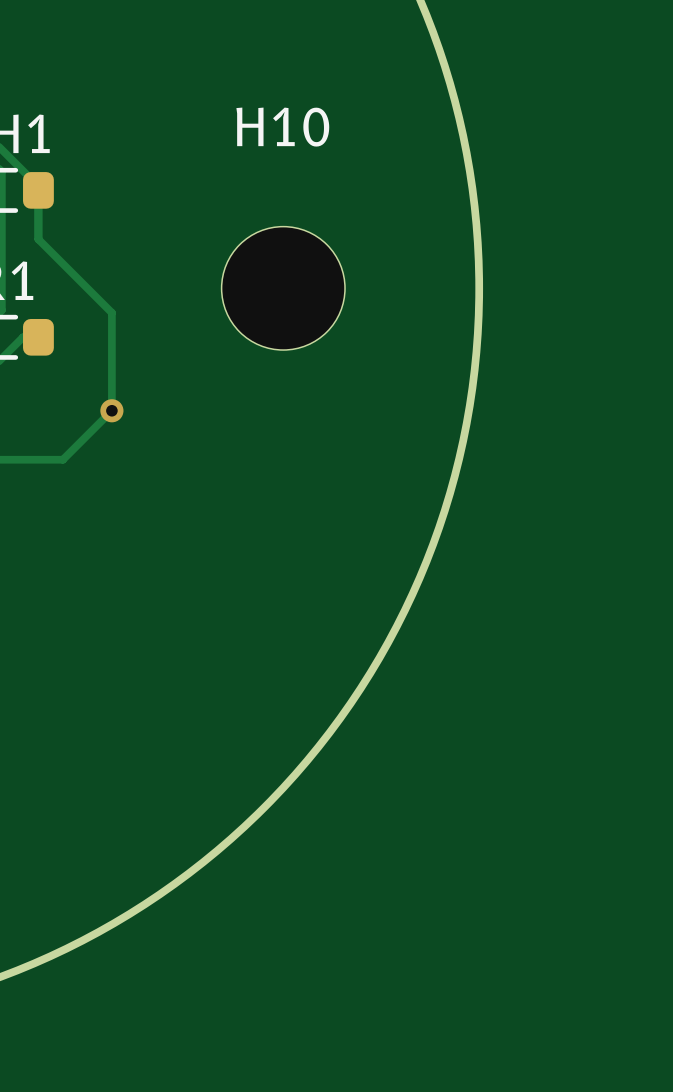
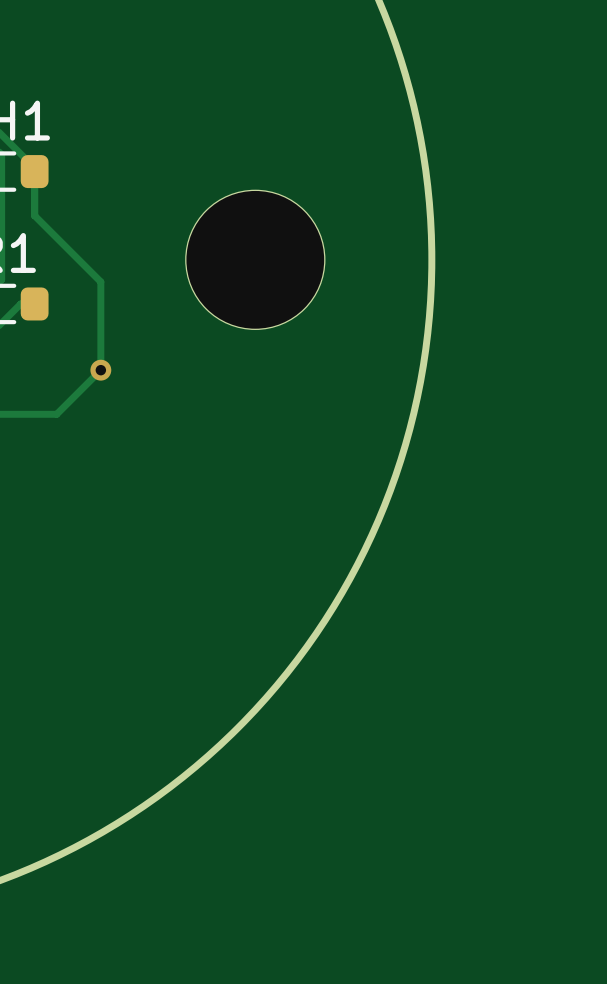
H10: (283, 288) -> none
part: none -> (255, 259)

